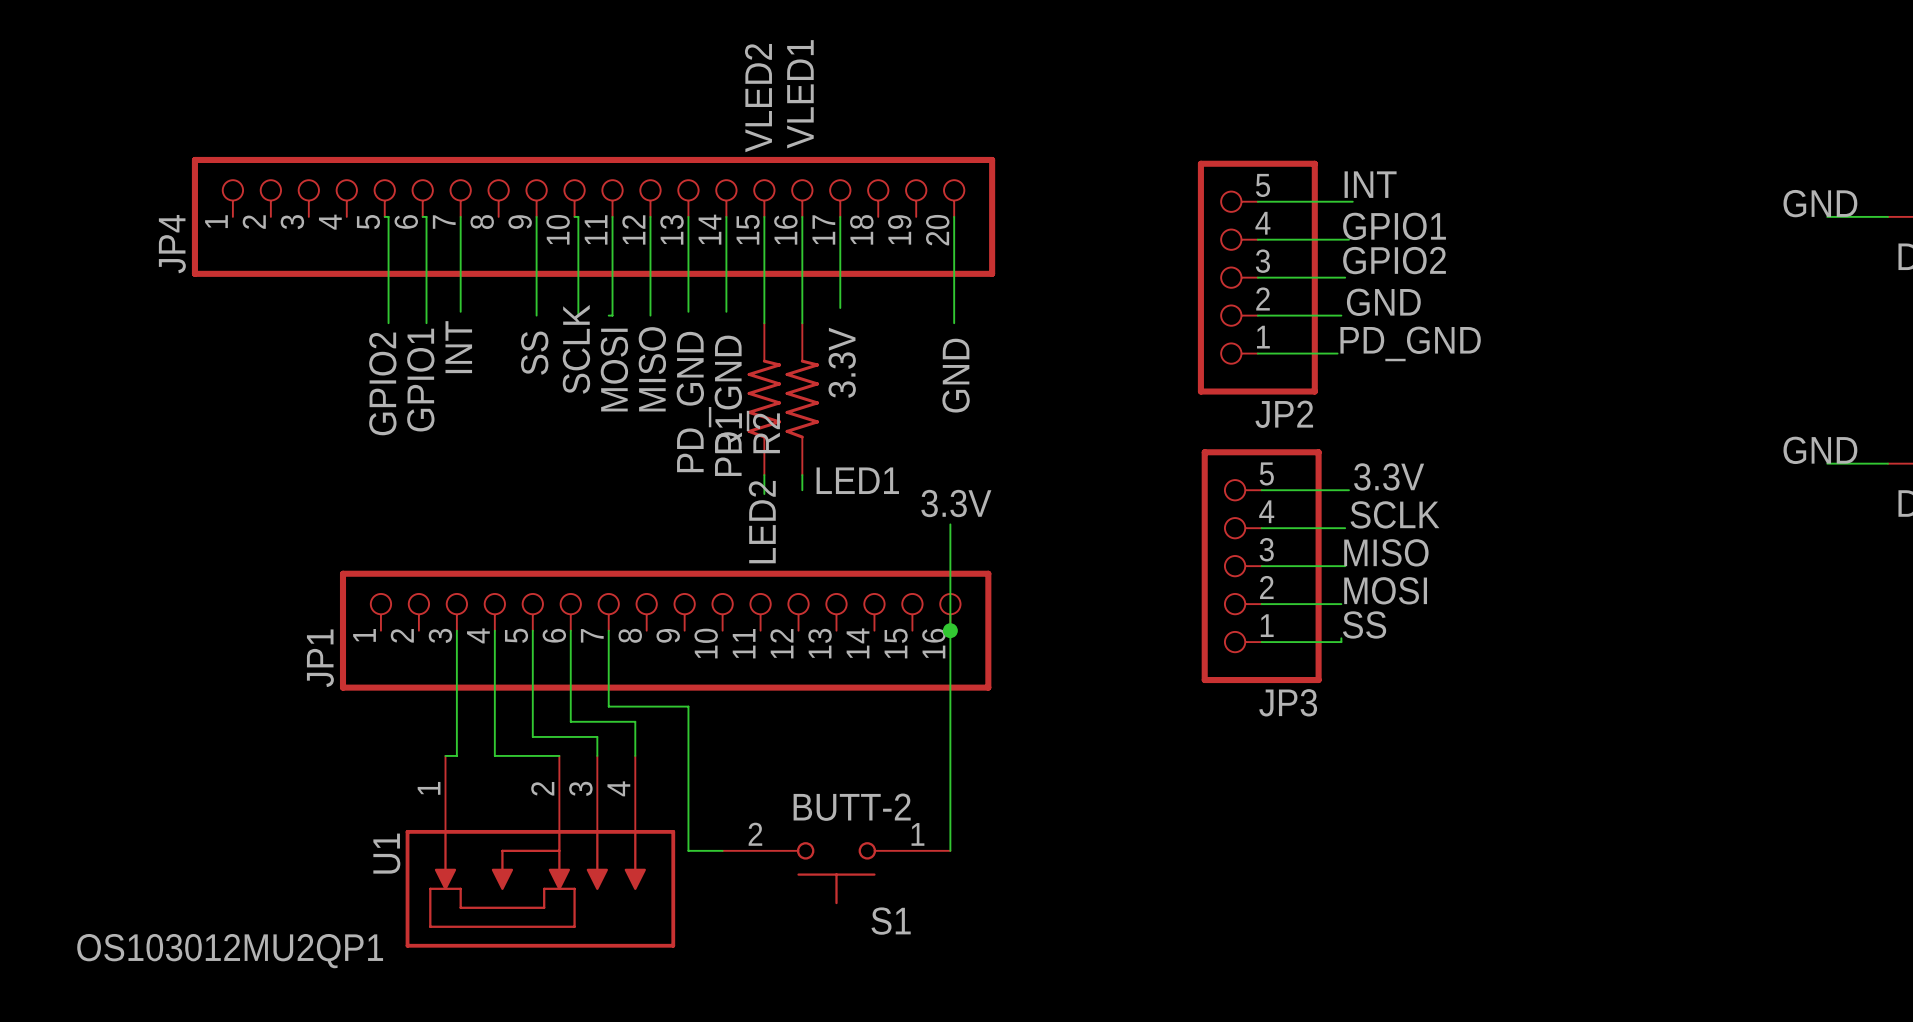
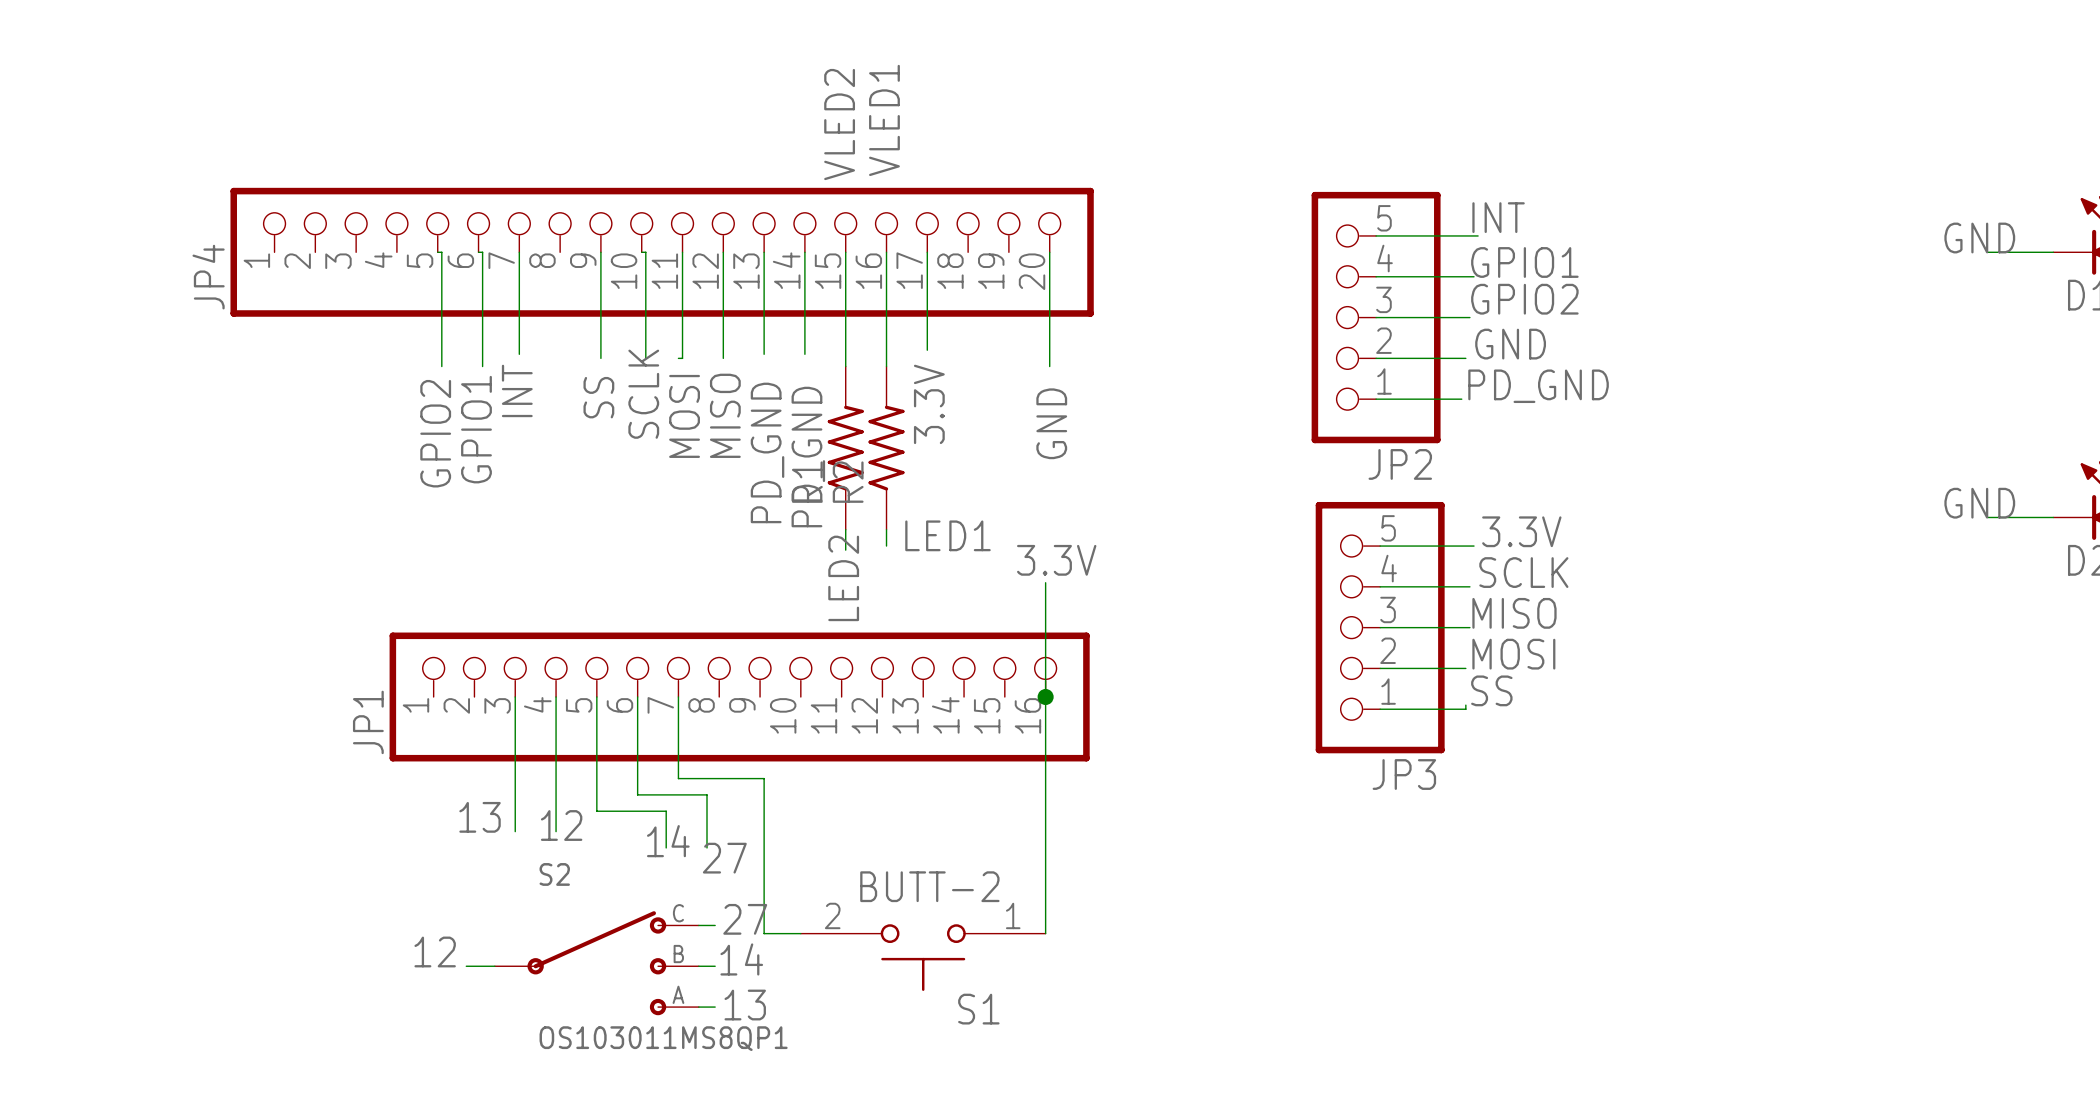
label: none -> 13 (480, 817)
label: none -> 12 (561, 825)
wire: (445, 755) (456, 755) -> none
wire: (494, 755) (559, 755) -> none
label: none -> 14 (668, 841)
label: none -> 27 (724, 858)
label: none -> 27 (745, 919)
wire: none -> (698, 925) (715, 925)
U1: OS103012MU2QP1 (540, 851) -> none
label: none -> 12 (435, 951)
label: none -> 14 (741, 959)
S2: none -> OS103011MS8QP1 (596, 963)
wire: none -> (466, 966) (494, 966)
label: none -> 13 (745, 1005)
wire: none -> (698, 1007) (715, 1007)

